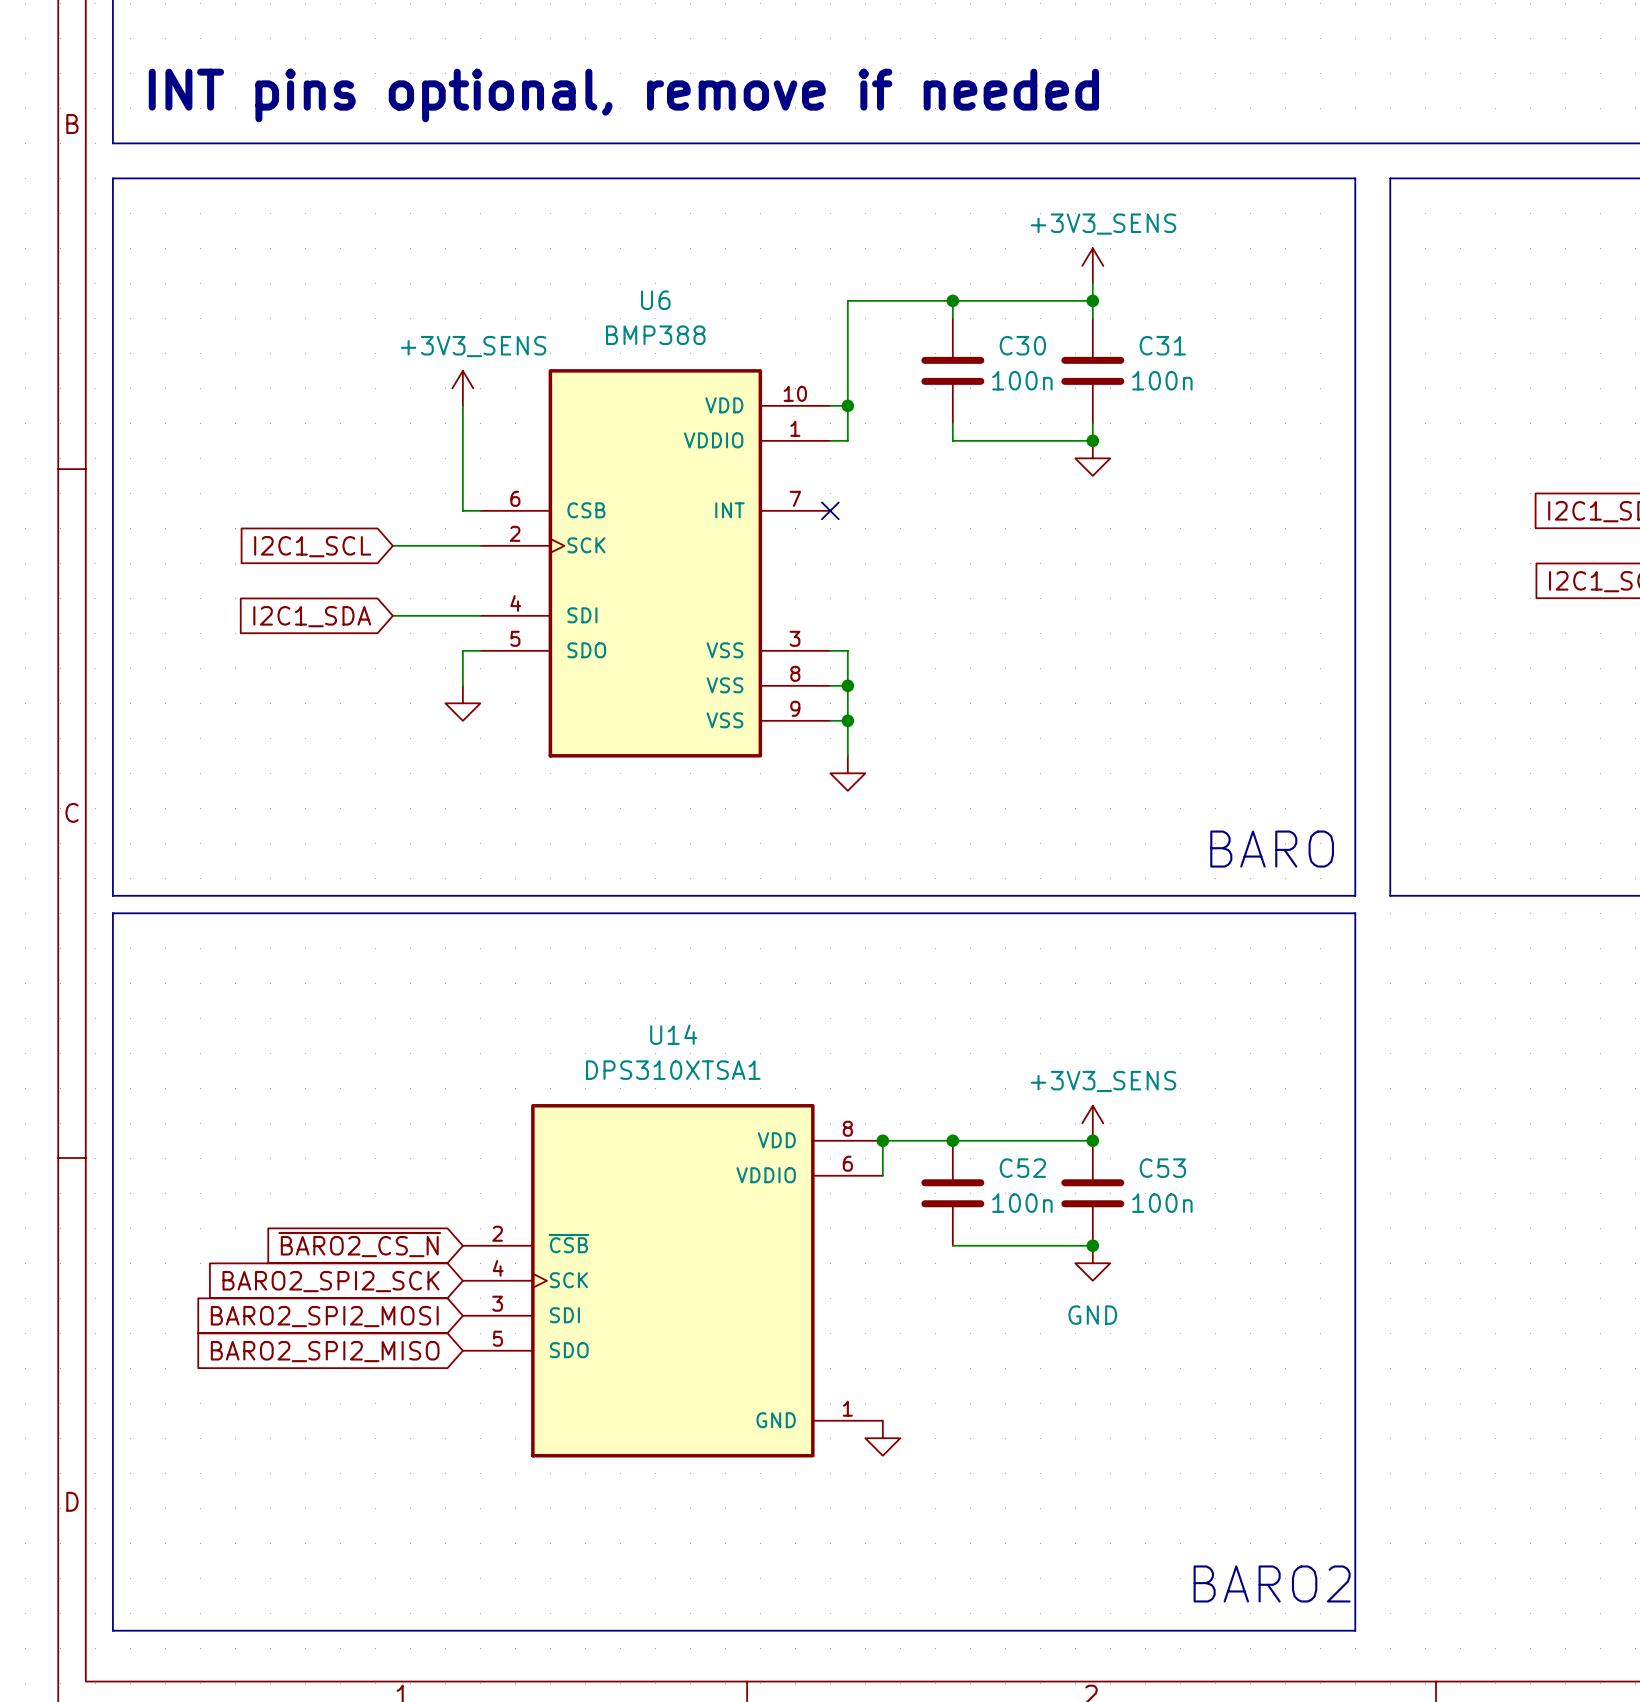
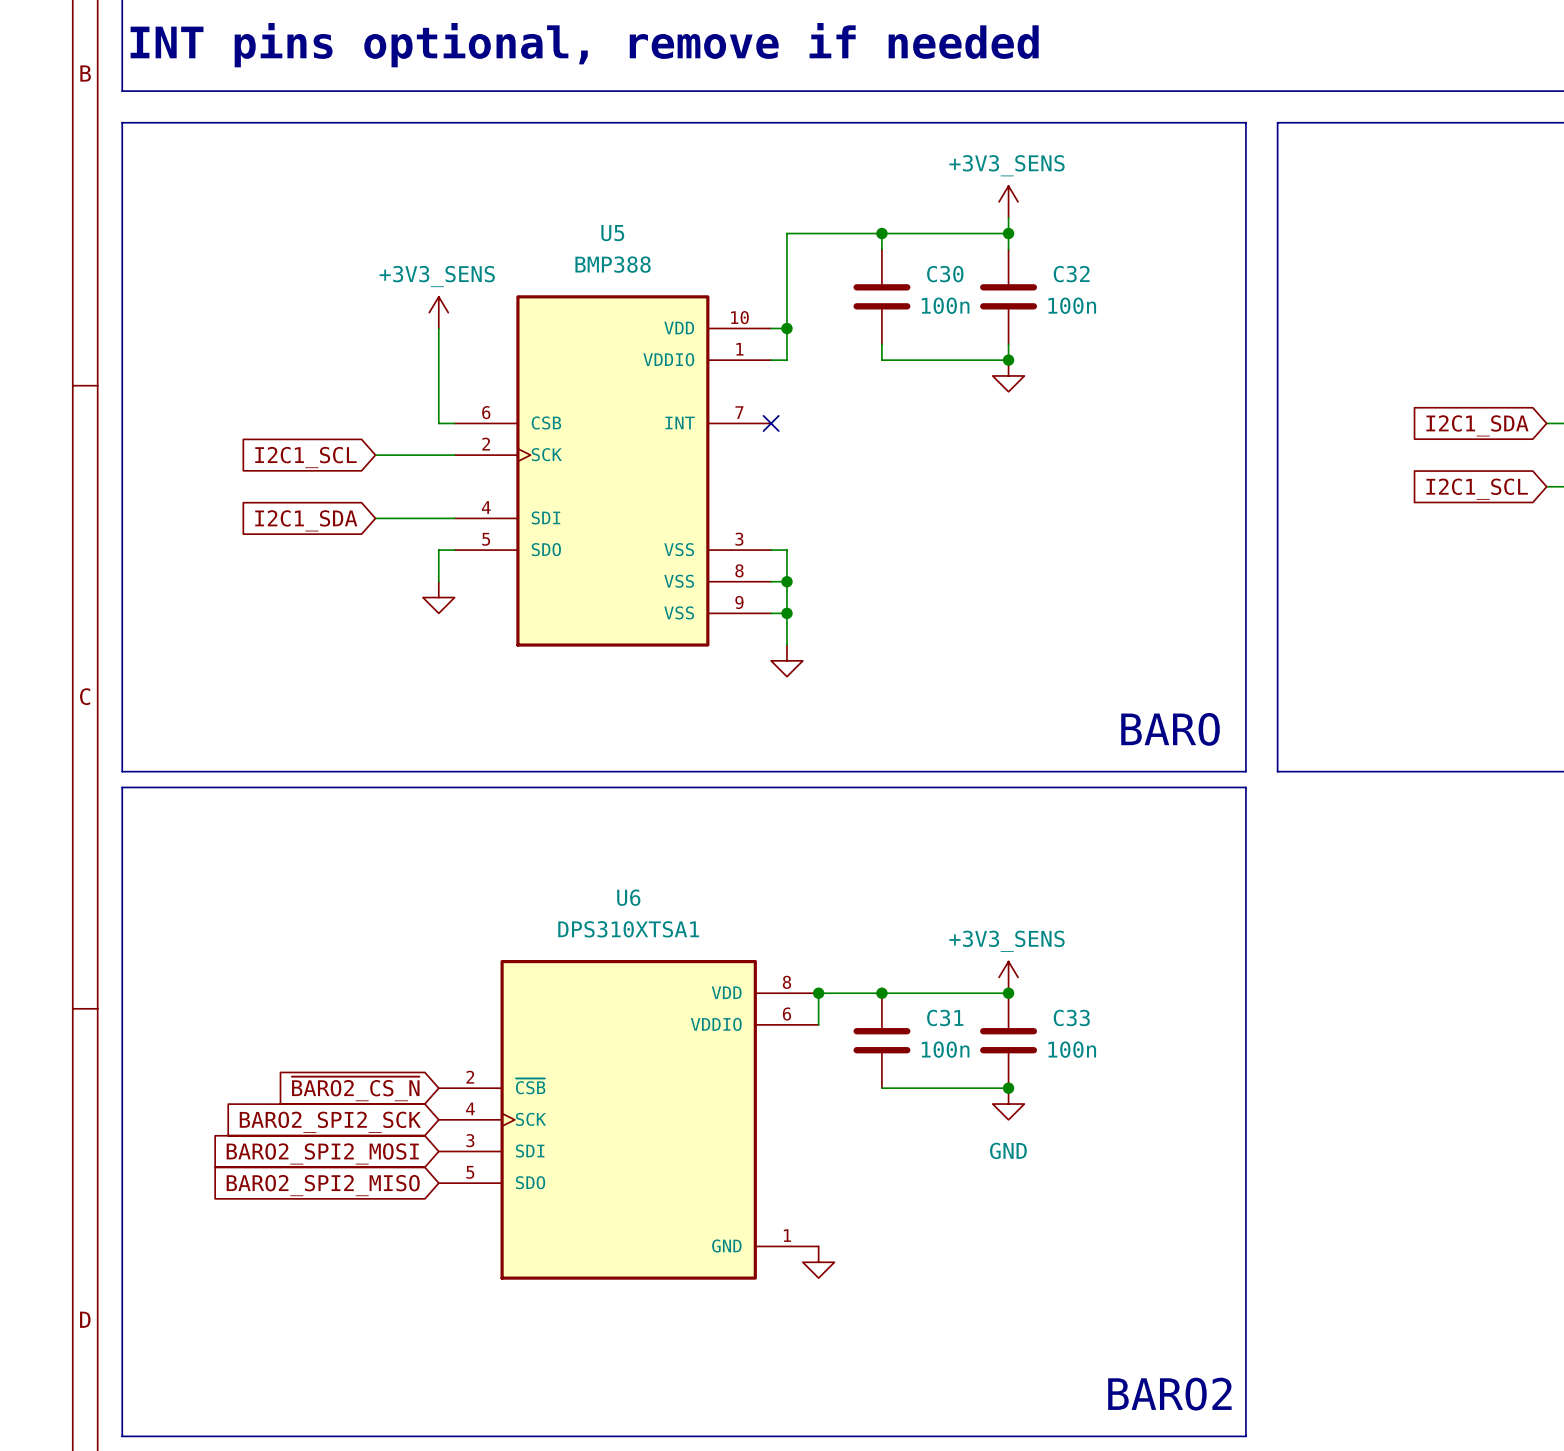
U6 name: U6 (655, 300) -> U5 (612, 233)
C31 name: C31 (1162, 345) -> C32 (1071, 274)
U14 name: U14 (673, 1034) -> U6 (628, 897)
C52 name: C52 (1022, 1168) -> C31 (945, 1017)
C53 name: C53 (1162, 1168) -> C33 (1071, 1017)

